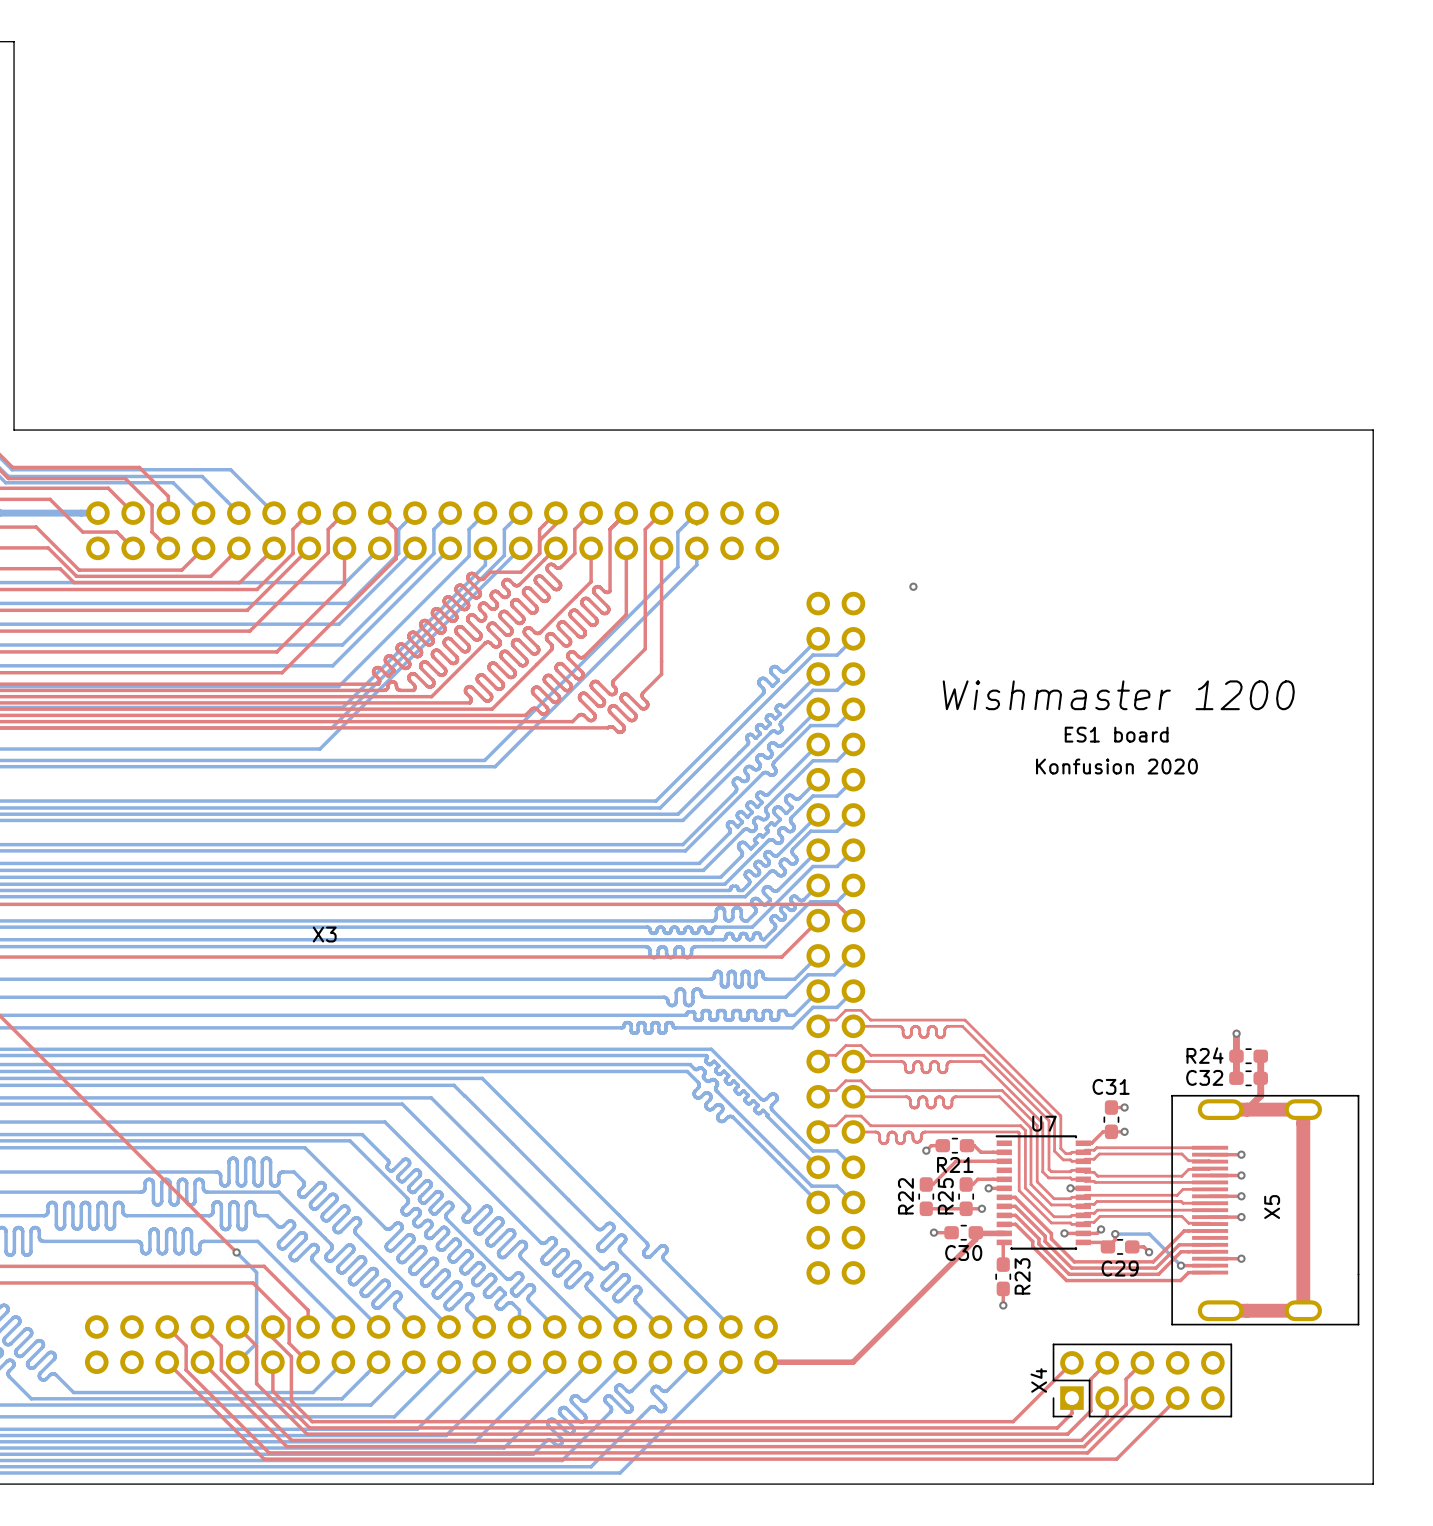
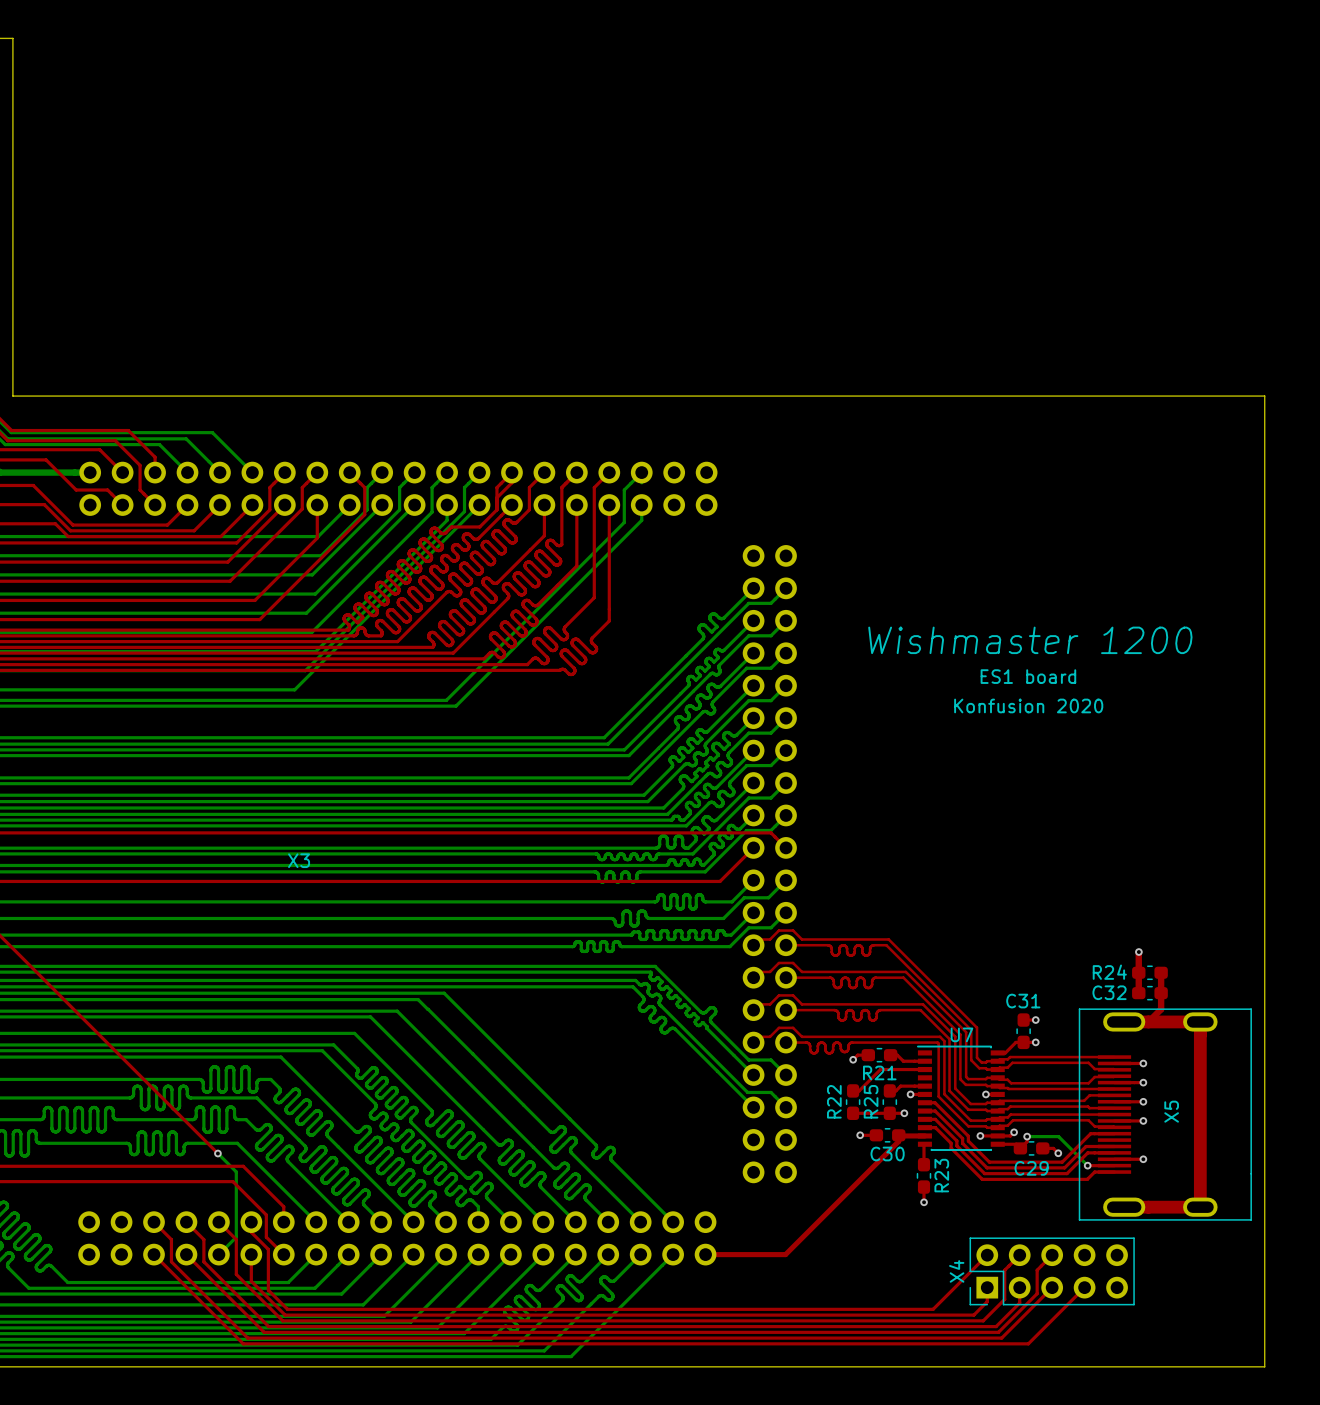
via: (913, 586) -> none

